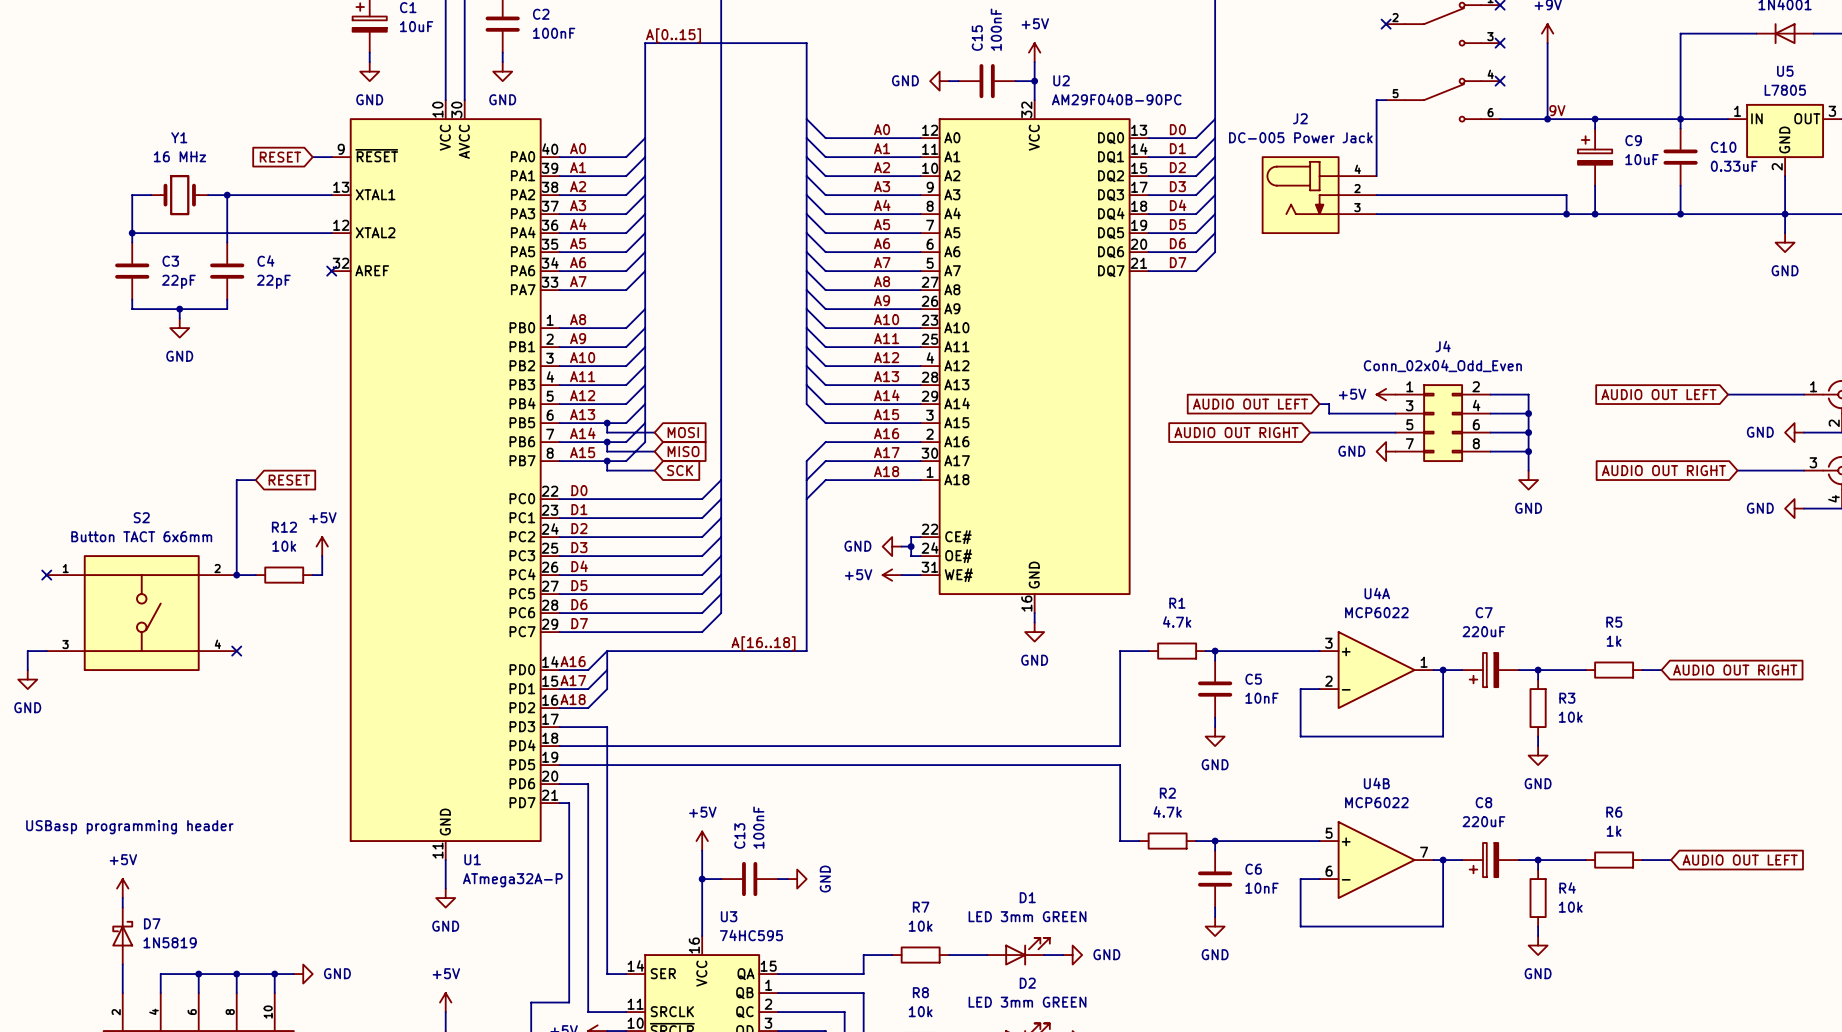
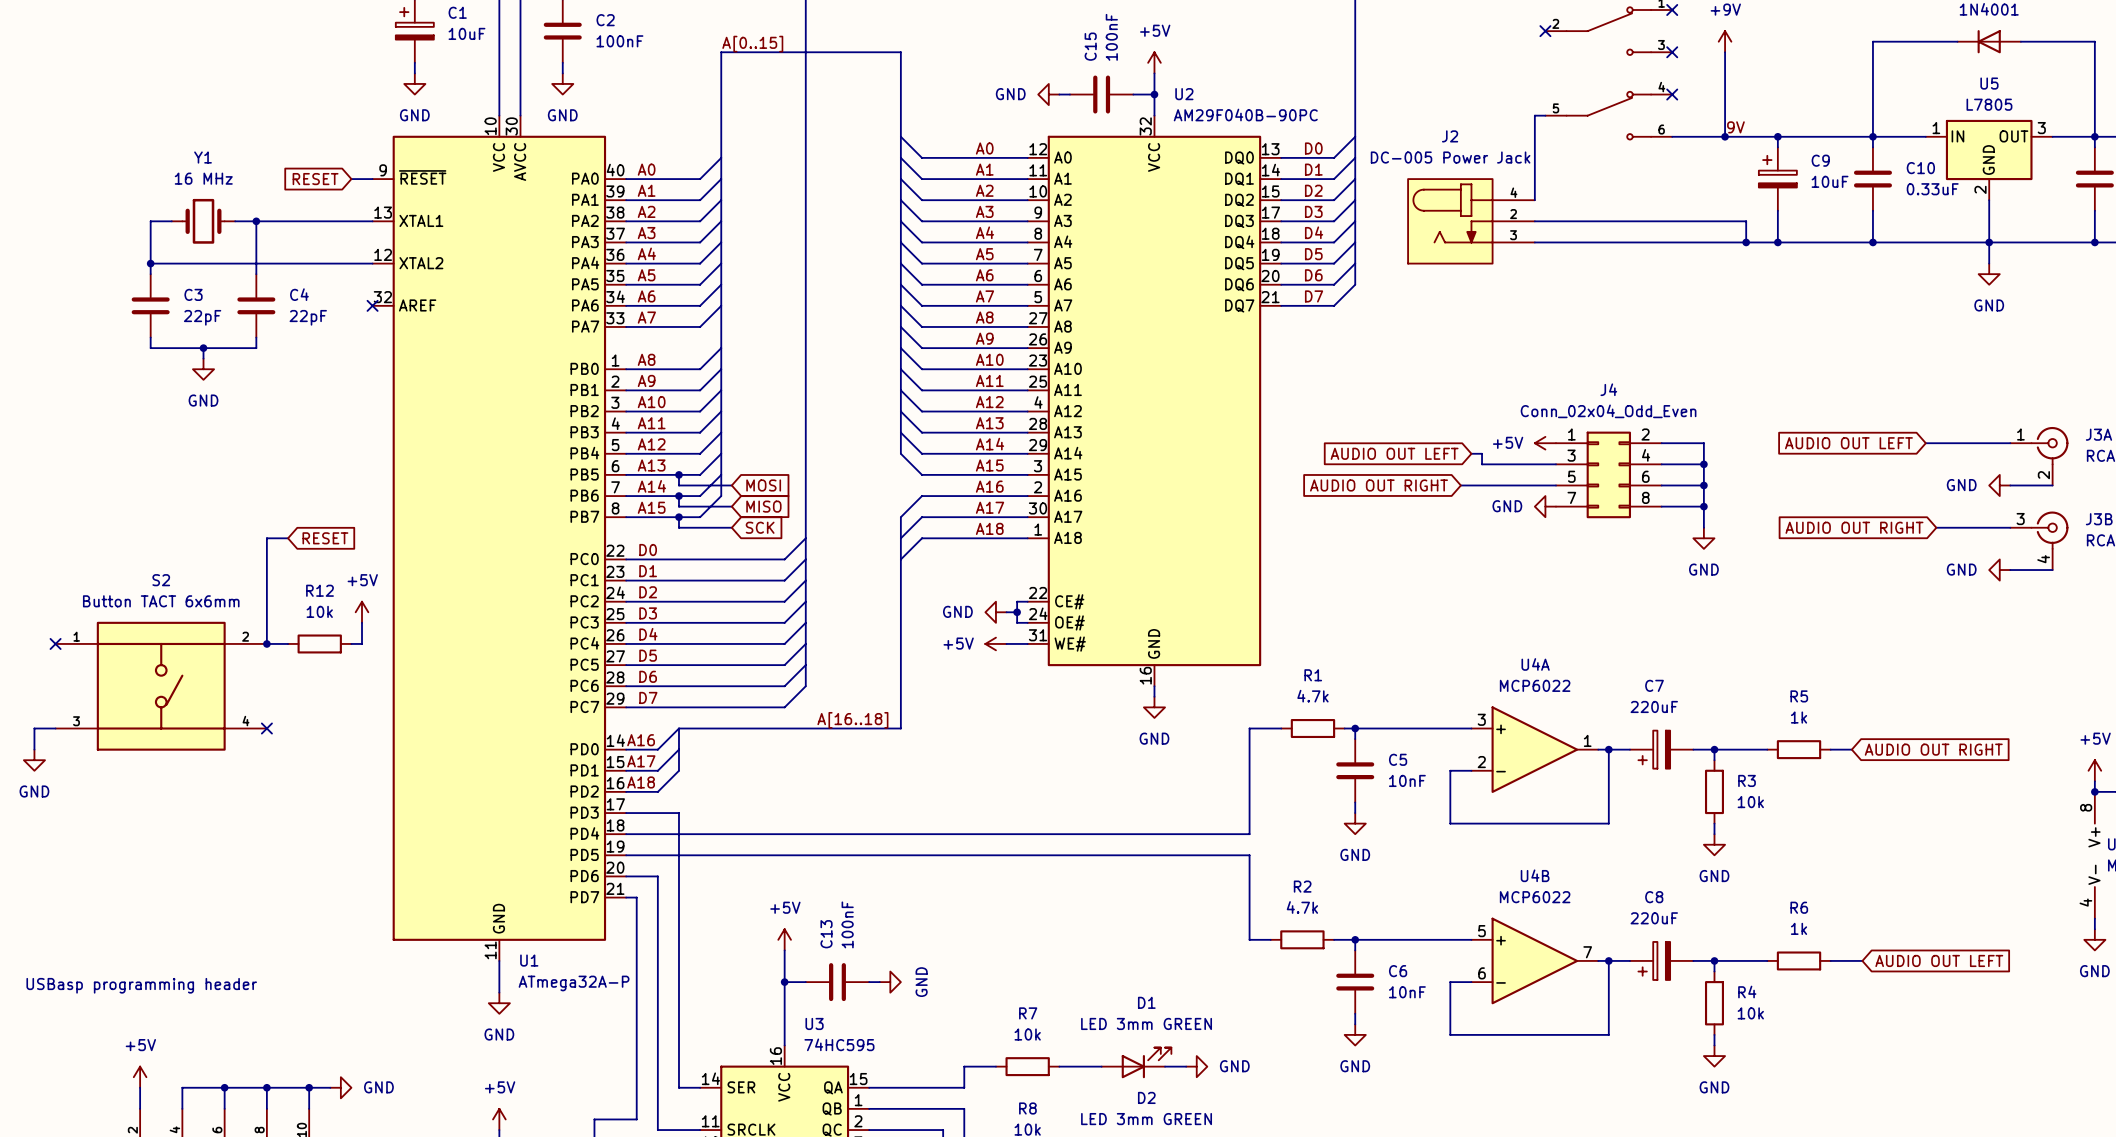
text position: USBasp programming header (129, 827) -> USBasp programming header (141, 985)
power symbol position: +5V (122, 888) -> +5V (140, 1077)
wire: (122, 898) (122, 907) -> none
D7: 1N5819 (122, 936) -> none

